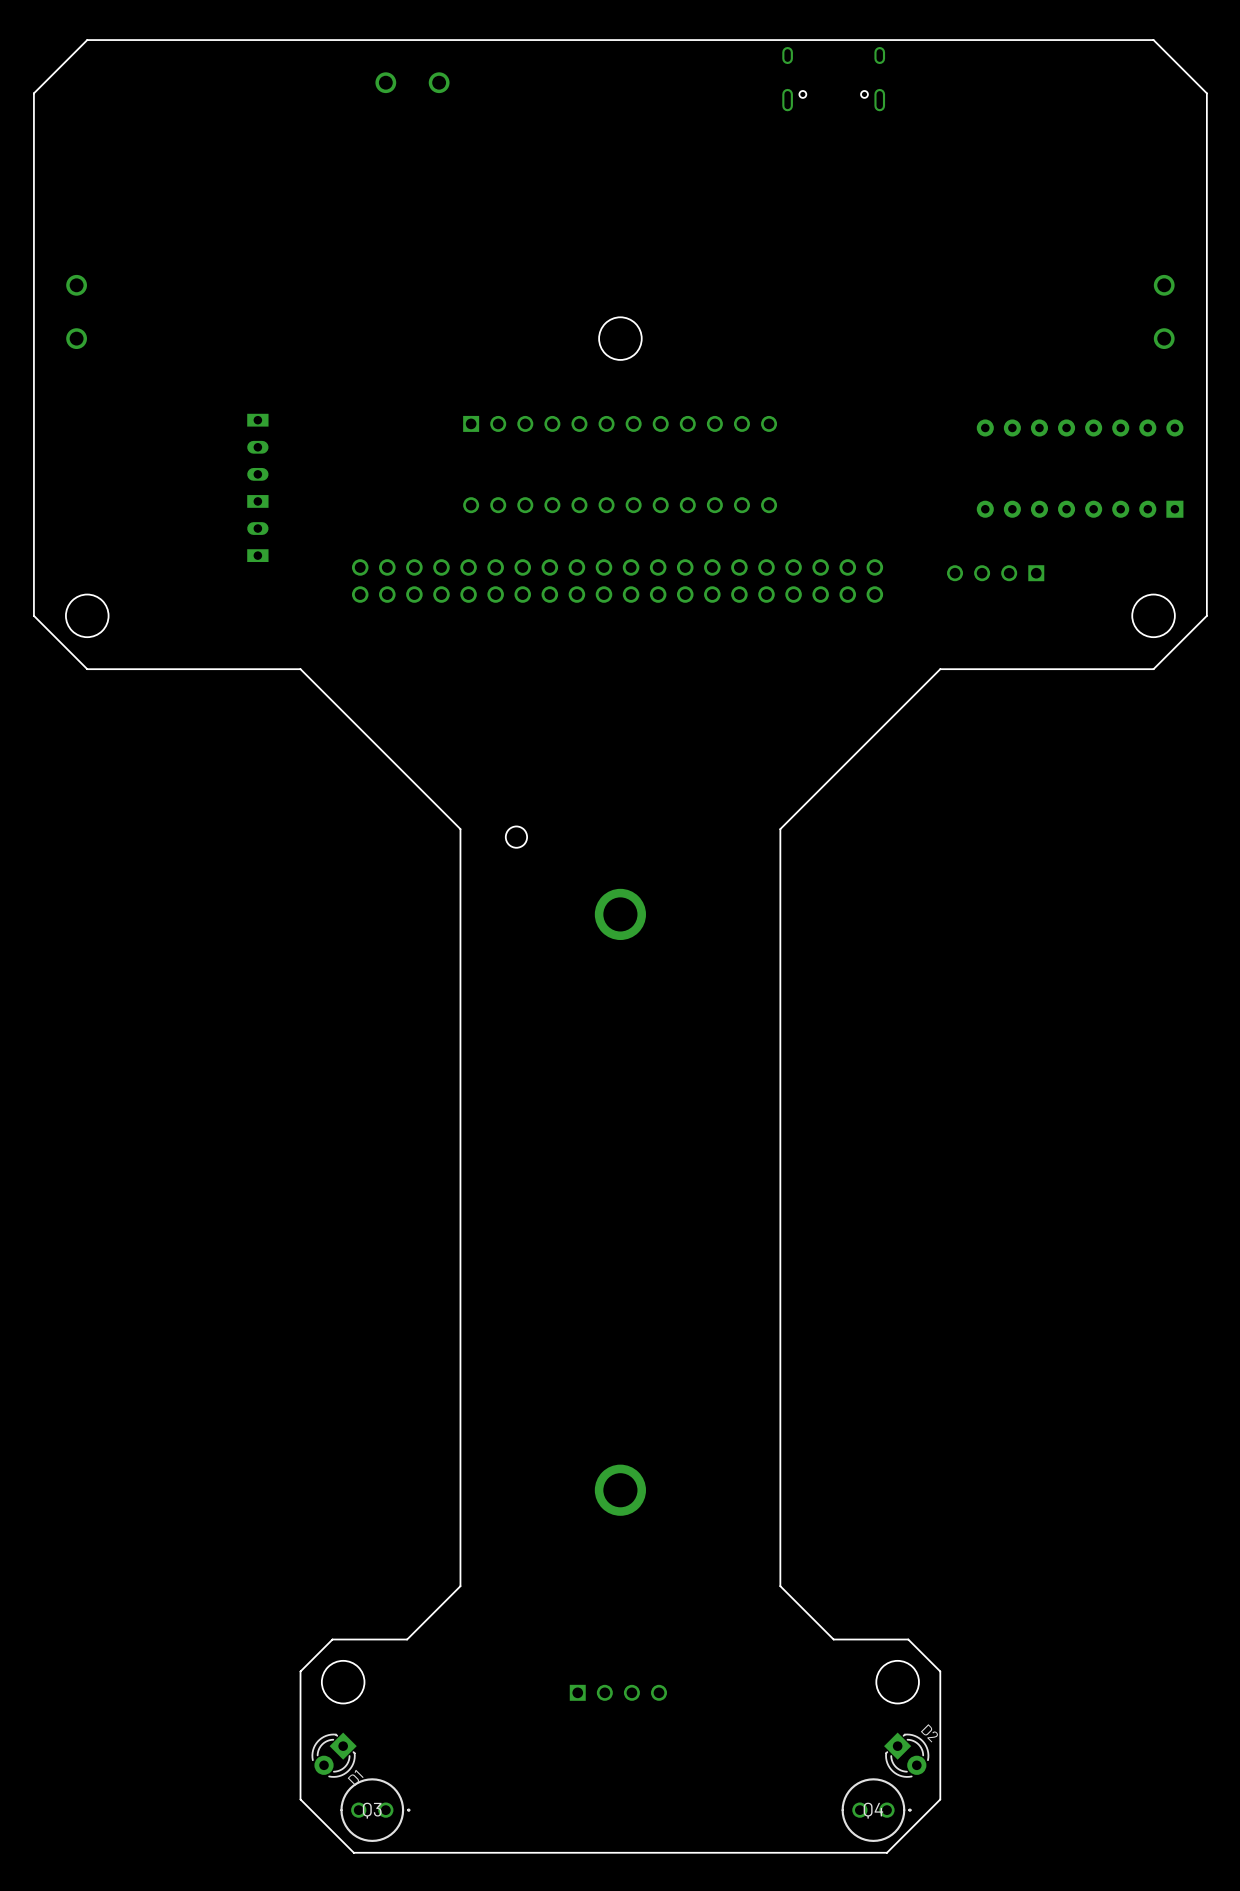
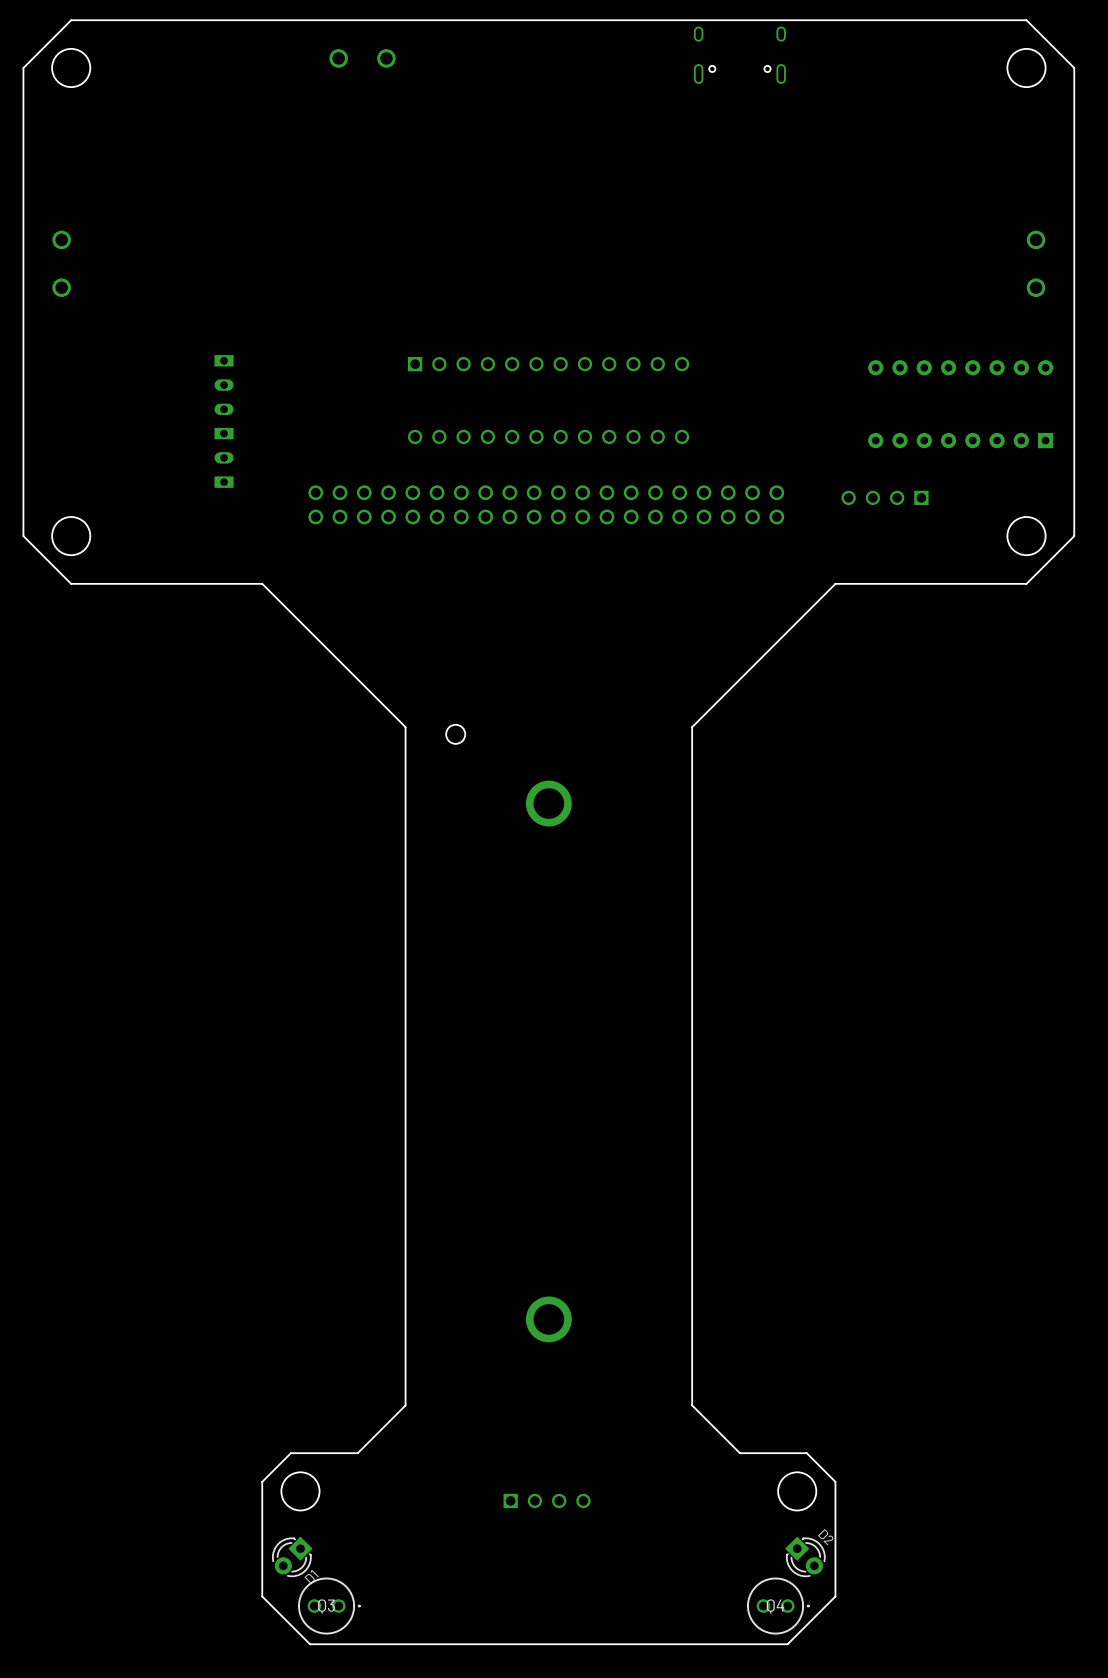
round board edge: none -> [51, 48, 91, 88]
round board edge: none -> [1007, 48, 1046, 88]
round board edge: [598, 317, 643, 361] -> none

